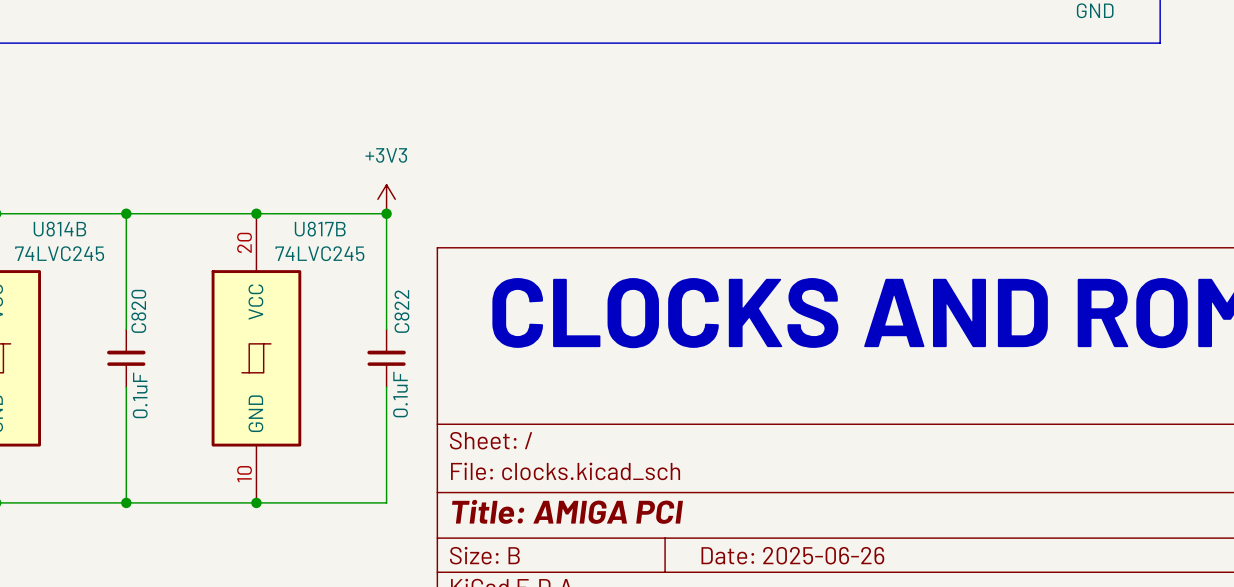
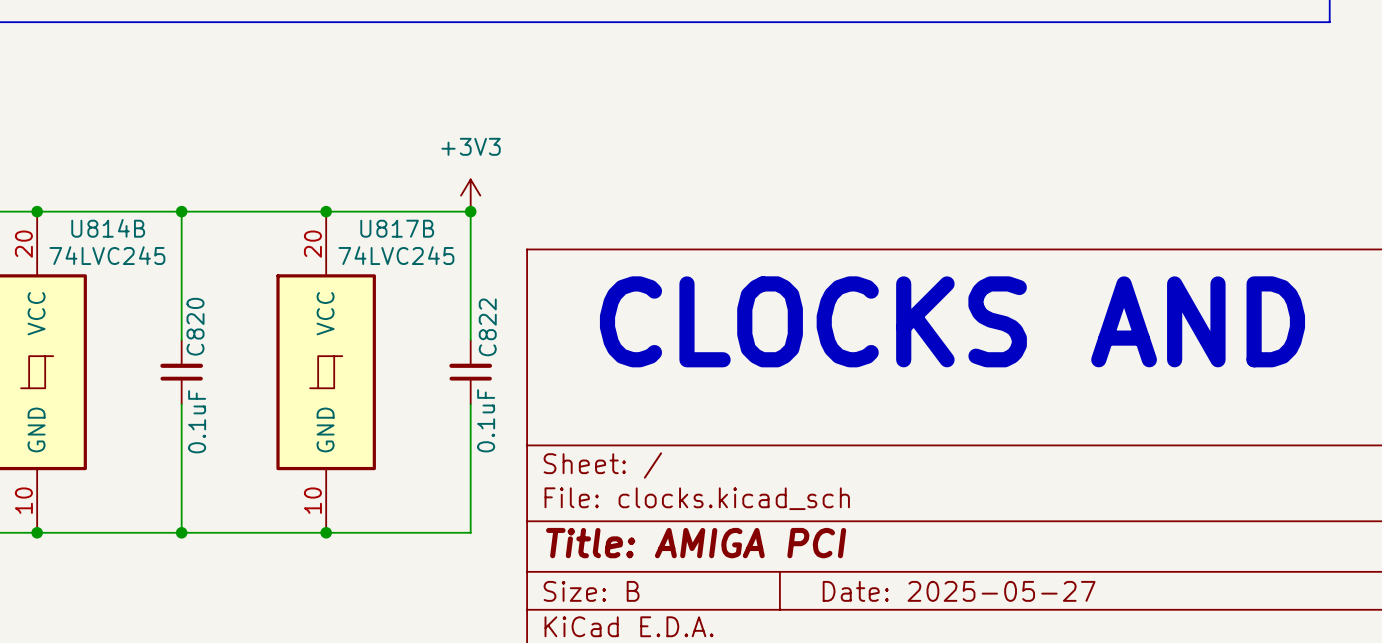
title block: Date: 2025-06-26 (792, 555) -> Date: 2025-05-27 (959, 591)

